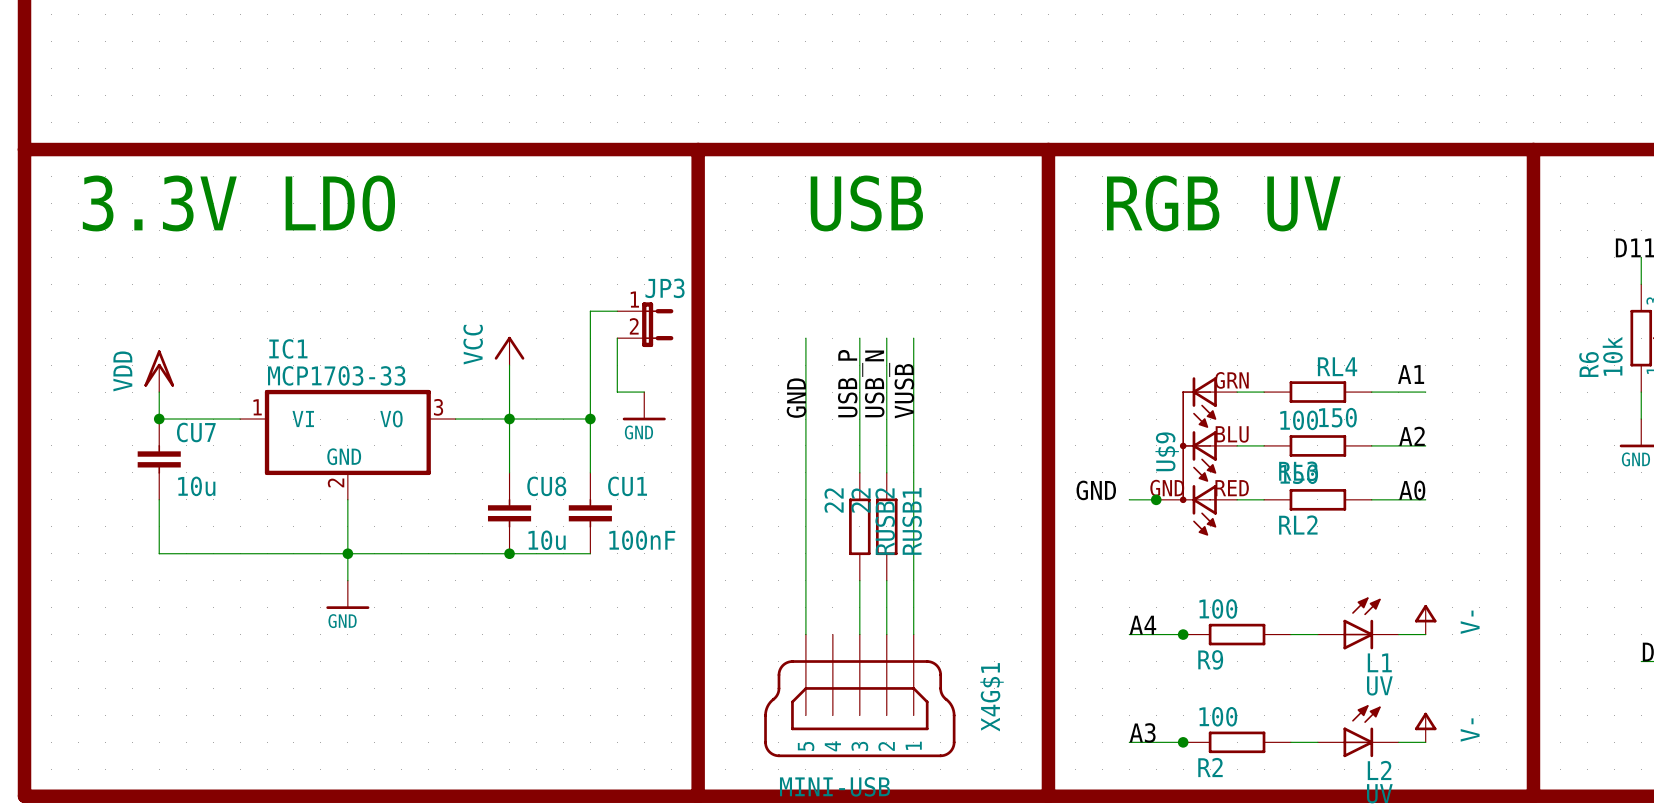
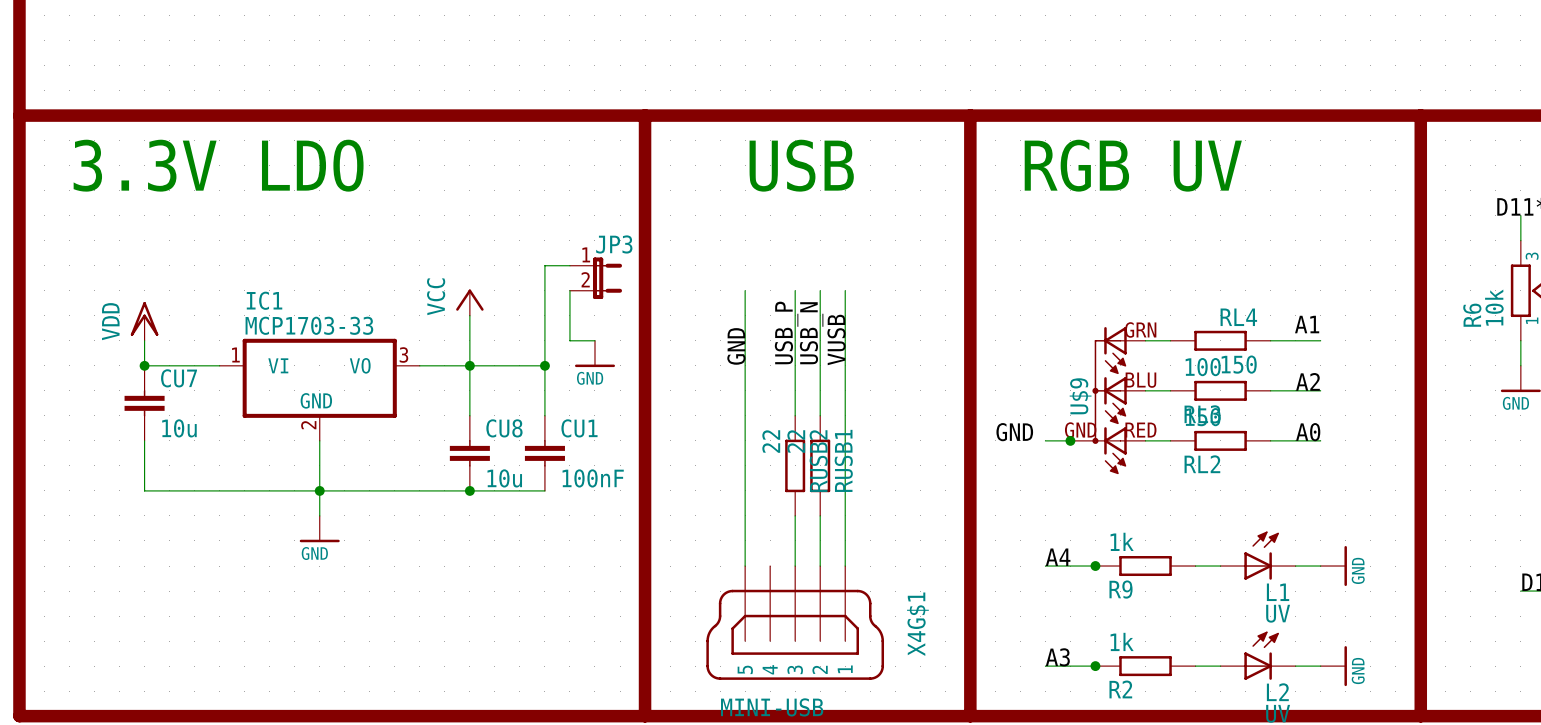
R9 value: 100 (1218, 608) -> 1k (1122, 541)
power symbol: V- (1425, 619) -> none
power symbol: none -> GND (1333, 566)
R2 value: 100 (1218, 716) -> 1k (1122, 641)
power symbol: V- (1425, 727) -> none
power symbol: none -> GND (1333, 666)

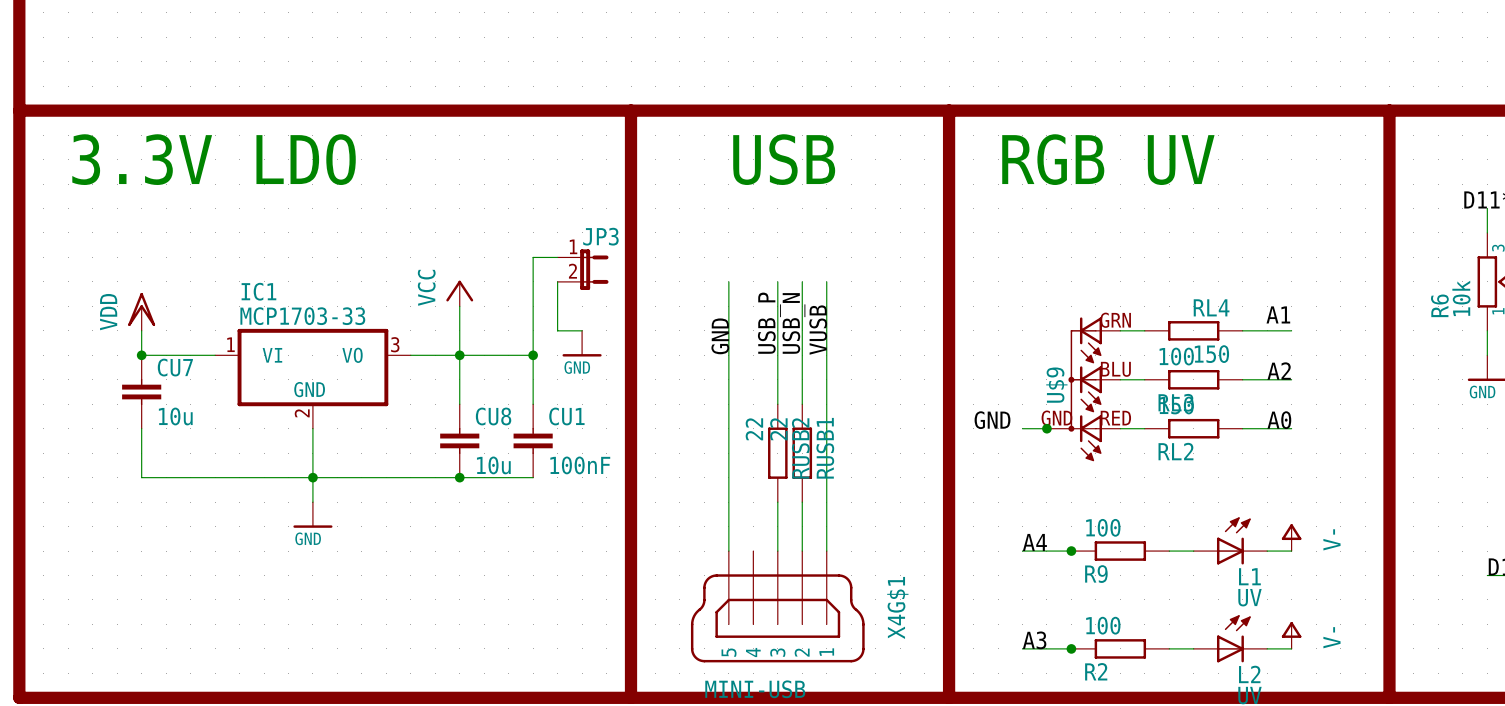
R9 value: 1k (1122, 541) -> 100 (1103, 527)
power symbol: none -> V- (1291, 537)
power symbol: GND (1333, 566) -> none
R2 value: 1k (1122, 641) -> 100 (1103, 625)
power symbol: none -> V- (1291, 635)
power symbol: GND (1333, 666) -> none

